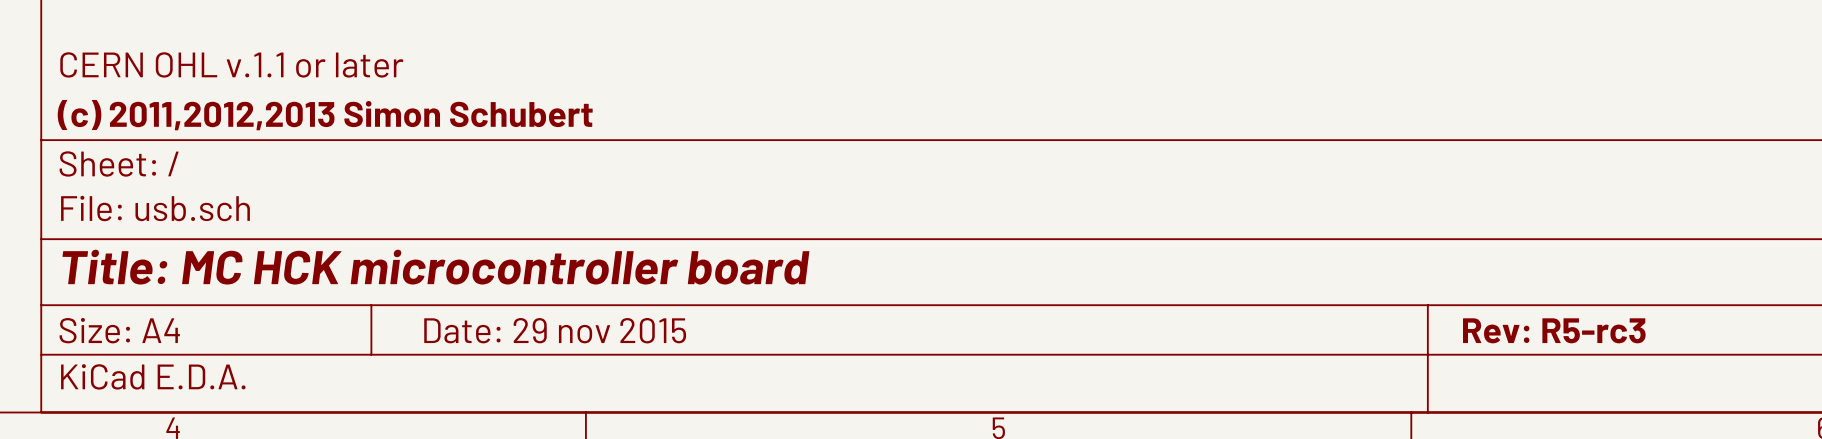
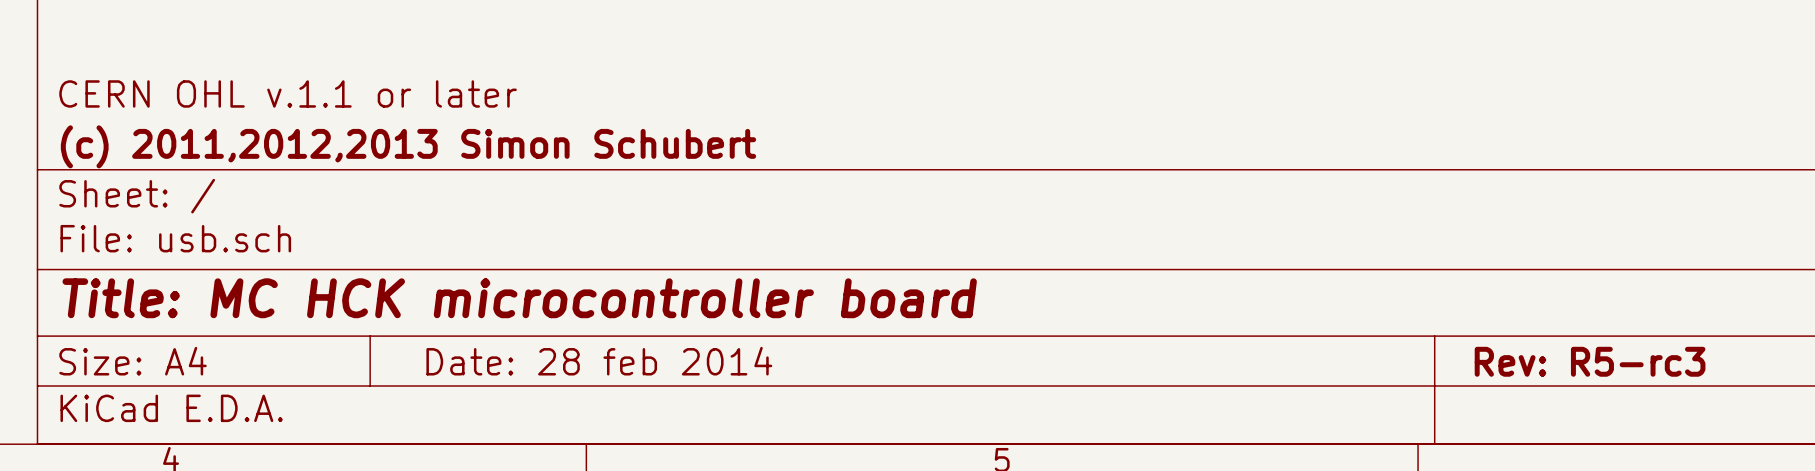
title block: Date: 29 nov 2015 (555, 330) -> Date: 28 feb 2014 (599, 361)

